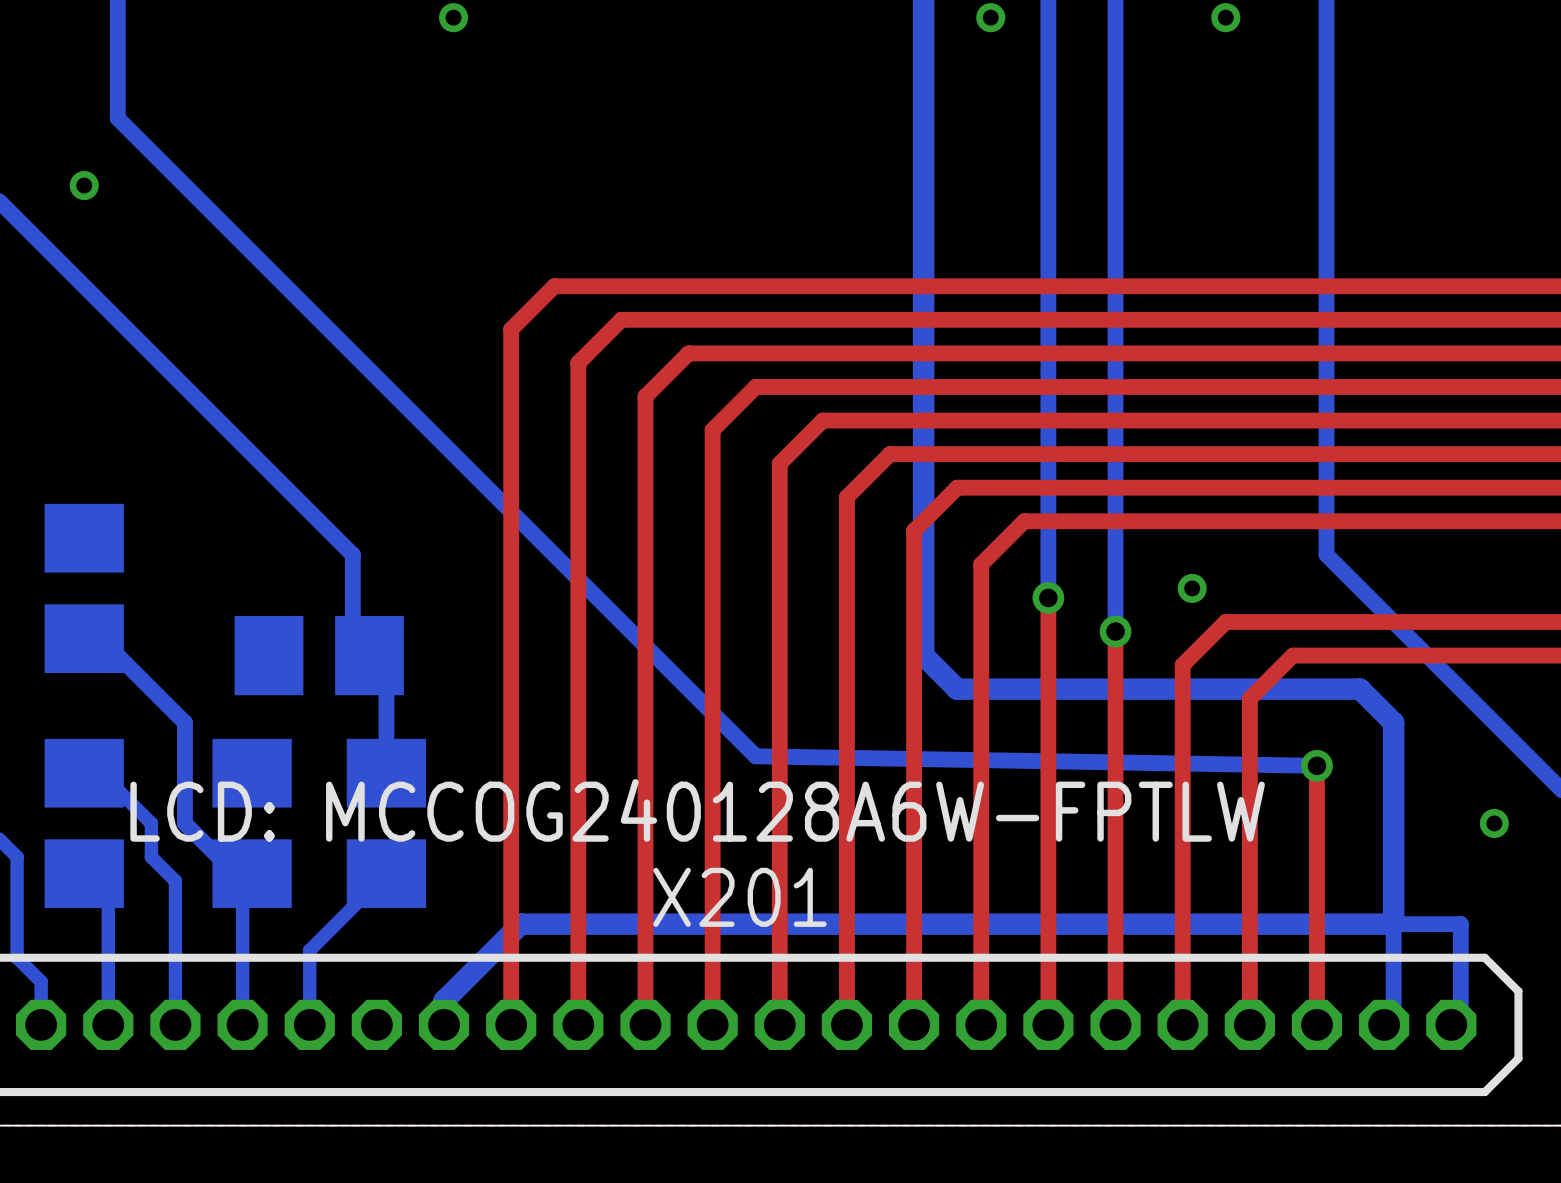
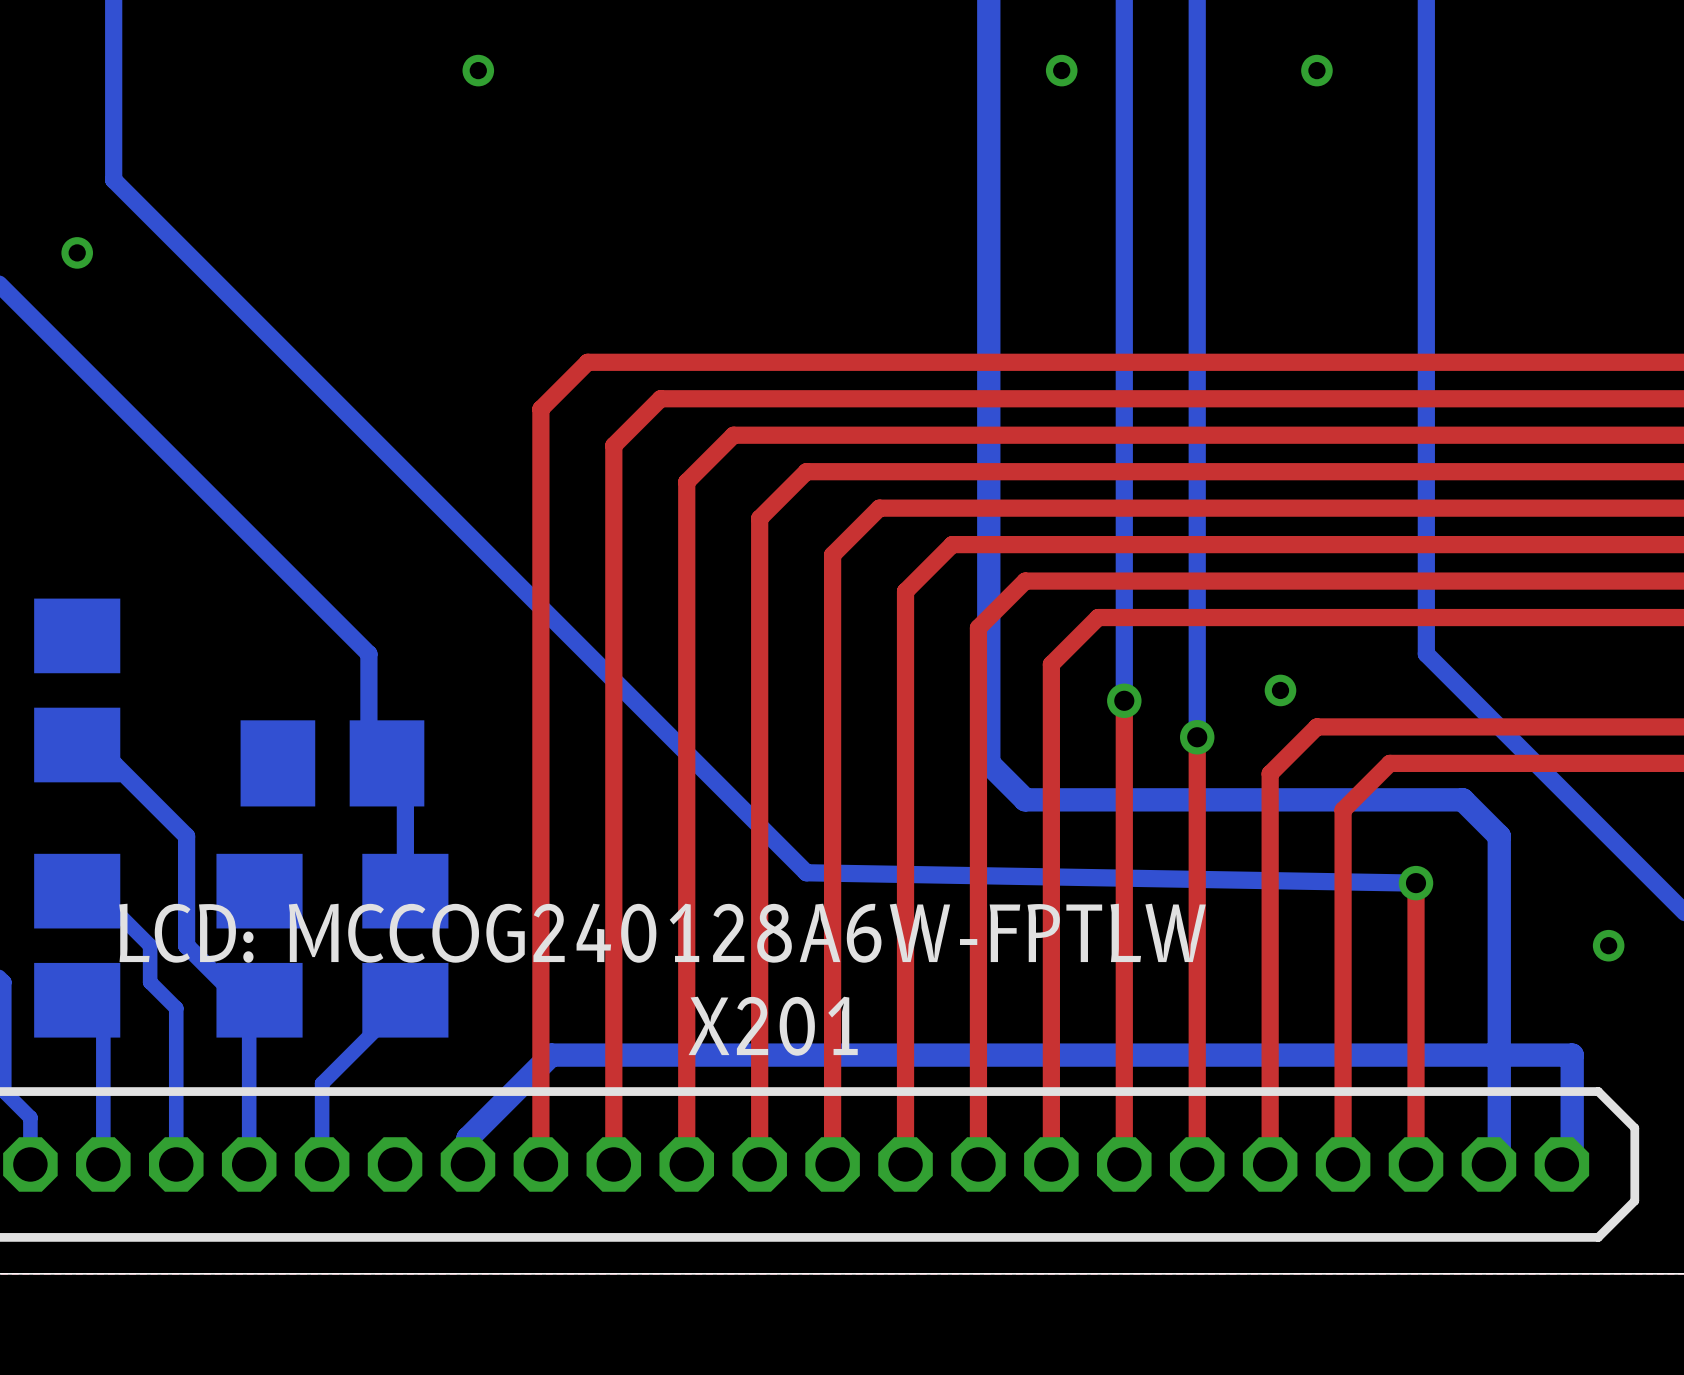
bottom track width: thin (1384, 1024) (1393, 1024) (1393, 924) (1460, 924) (1460, 1024) (1451, 1024) -> thick (1488, 1164) (1499, 1164) (1499, 1055) (1572, 1055) (1572, 1164) (1561, 1164)

